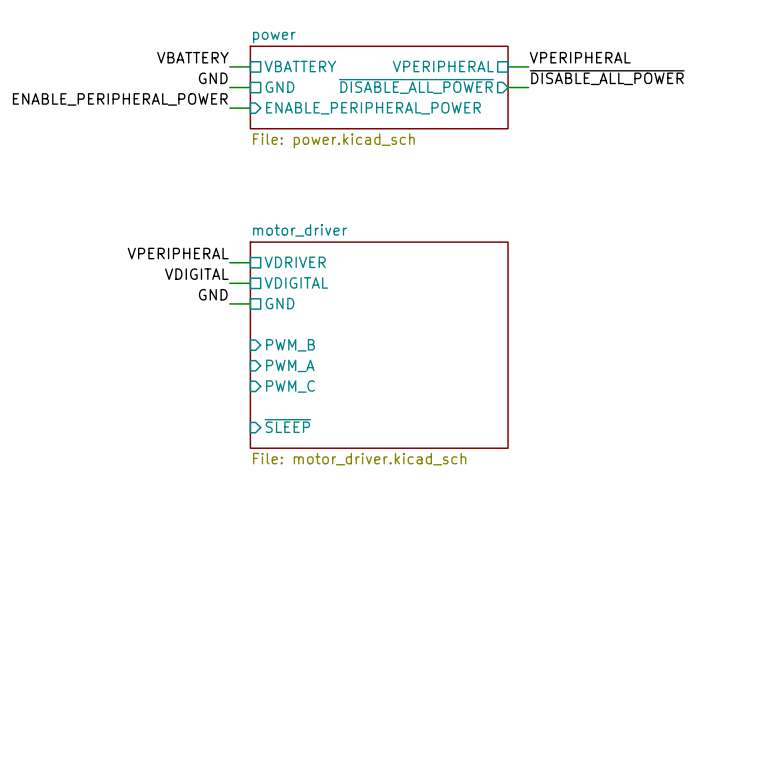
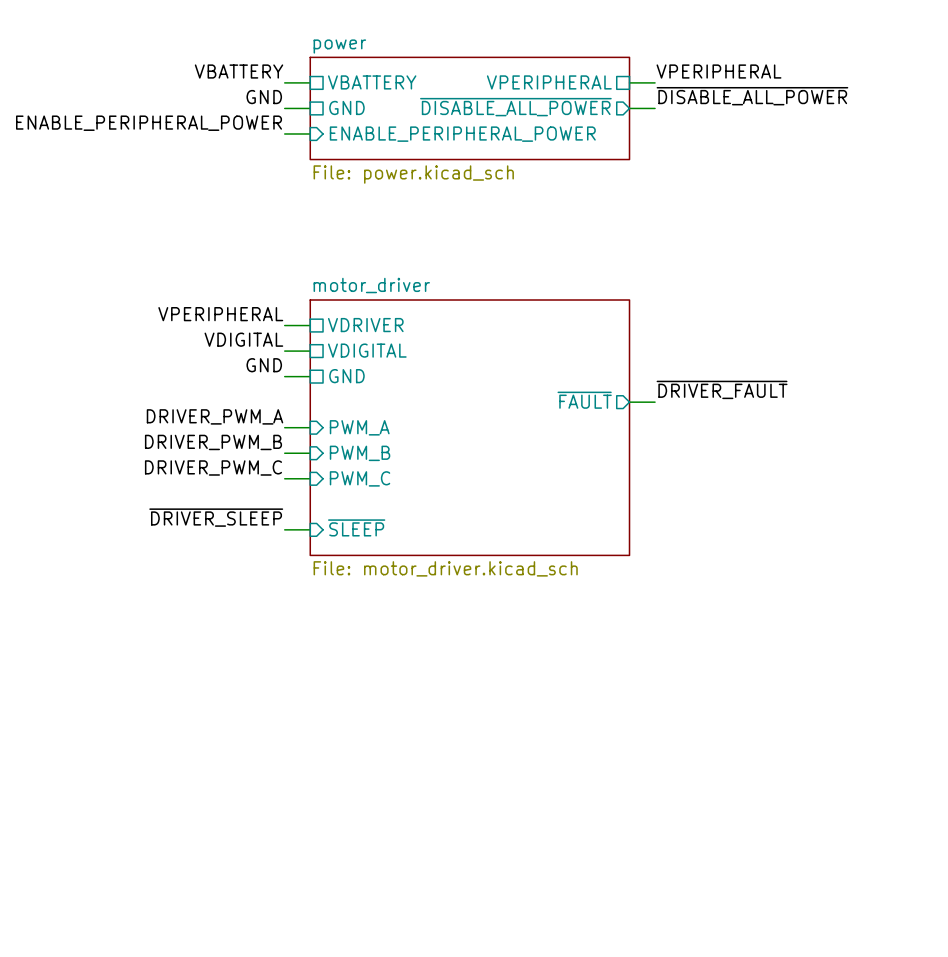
label: none -> ~{DRIVER_FAULT} (722, 389)
sheet pin: none -> ~{FAULT} (584, 400)
wire: none -> (629, 402) (655, 402)
label: none -> DRIVER_PWM_A (215, 416)
wire: none -> (284, 427) (310, 427)
sheet pin: PWM_B (290, 345) -> PWM_A (359, 427)
label: none -> DRIVER_PWM_B (213, 442)
wire: none -> (284, 453) (310, 453)
sheet pin: PWM_A (290, 365) -> PWM_B (360, 453)
label: none -> DRIVER_PWM_C (213, 467)
wire: none -> (284, 478) (310, 478)
label: none -> ~{DRIVER_SLEEP} (216, 517)
wire: none -> (284, 529) (310, 529)

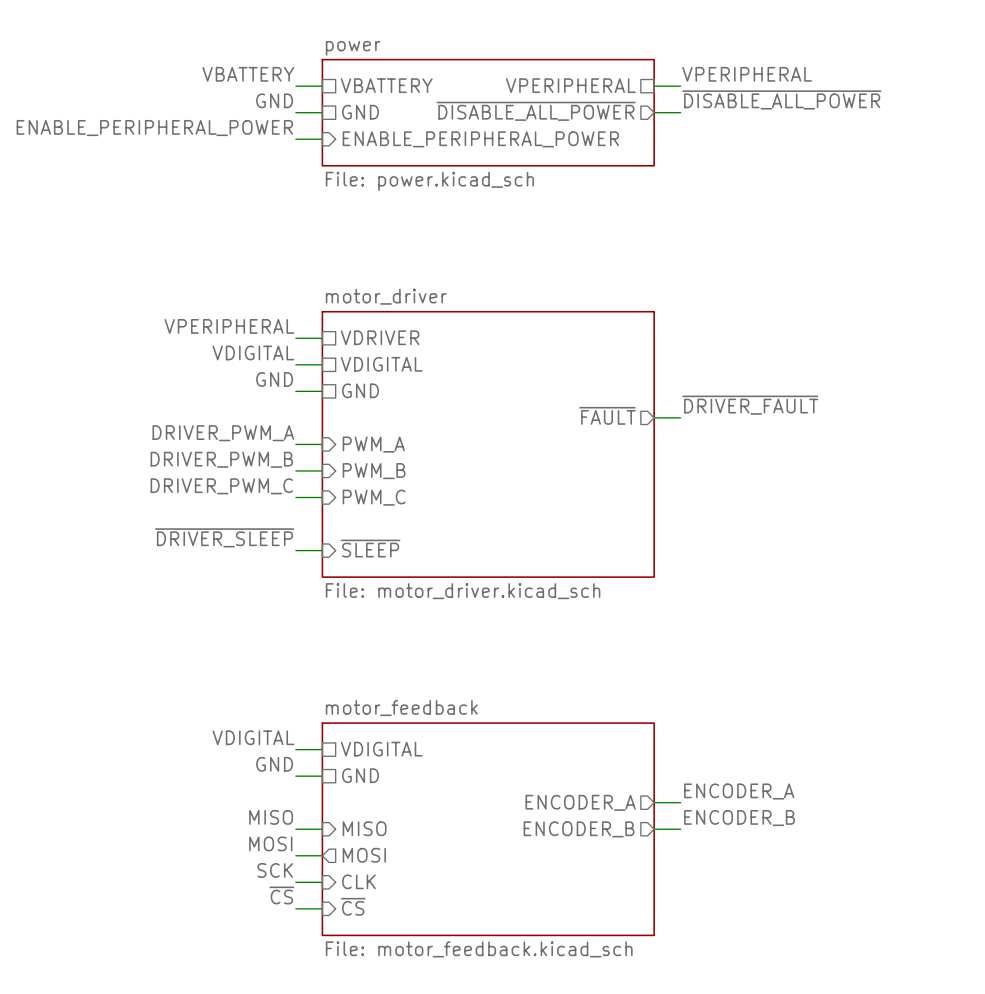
label: none -> VDIGITAL (253, 737)
sheet pin: none -> VDIGITAL (381, 749)
wire: none -> (295, 749) (322, 749)
label: none -> GND (274, 764)
wire: none -> (295, 776) (322, 776)
sheet pin: none -> GND (360, 775)
label: none -> ENCODER_A (739, 791)
sheet pin: none -> ENCODER_A (580, 802)
wire: none -> (654, 802) (680, 802)
label: none -> MISO (271, 817)
label: none -> ENCODER_B (739, 818)
sheet pin: none -> MISO (364, 828)
wire: none -> (295, 829) (322, 829)
sheet motor_feedback: none -> File: motor_feedback.kicad_sch (488, 829)
sheet pin: none -> ENCODER_B (579, 829)
wire: none -> (654, 829) (680, 829)
label: none -> MOSI (270, 843)
wire: none -> (295, 855) (322, 855)
sheet pin: none -> MOSI (364, 855)
label: none -> SCK (275, 870)
sheet pin: none -> CLK (358, 881)
wire: none -> (295, 882) (322, 882)
label: none -> ~{CS} (281, 895)
sheet pin: none -> ~{CS} (353, 906)
wire: none -> (295, 908) (322, 908)

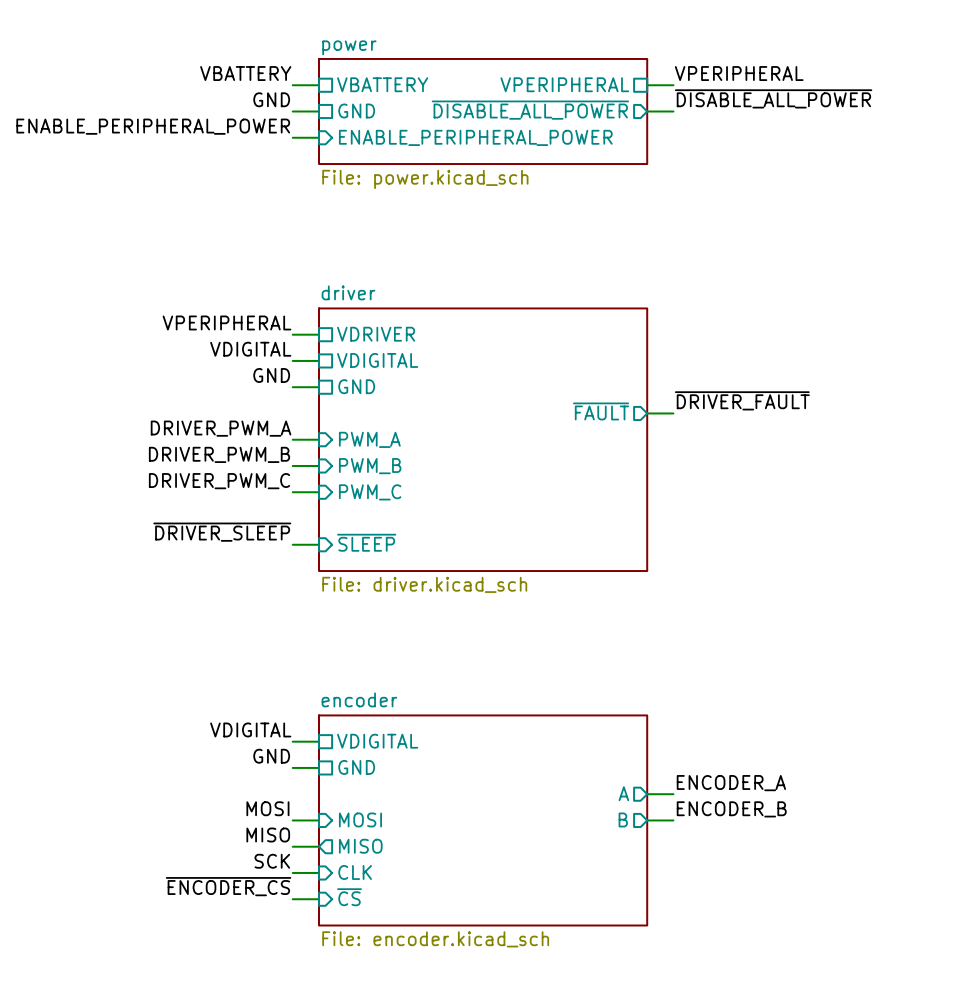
sheet motor_driver name: motor_driver (386, 296) -> driver (348, 292)
sheet motor_driver value: File: motor_driver.kicad_sch (463, 591) -> File: driver.kicad_sch (424, 584)
sheet motor_feedback name: motor_feedback (401, 708) -> encoder (359, 699)
sheet pin: ENCODER_A (580, 802) -> A (623, 793)
label: MISO (271, 817) -> MOSI (267, 808)
sheet pin: MISO (364, 828) -> MOSI (360, 819)
sheet pin: ENCODER_B (579, 829) -> B (623, 819)
label: MOSI (270, 843) -> MISO (268, 835)
sheet pin: MOSI (364, 855) -> MISO (360, 846)
label: ~{CS} (281, 895) -> ~{ENCODER_CS} (228, 886)
sheet motor_feedback value: File: motor_feedback.kicad_sch (479, 949) -> File: encoder.kicad_sch (435, 939)

